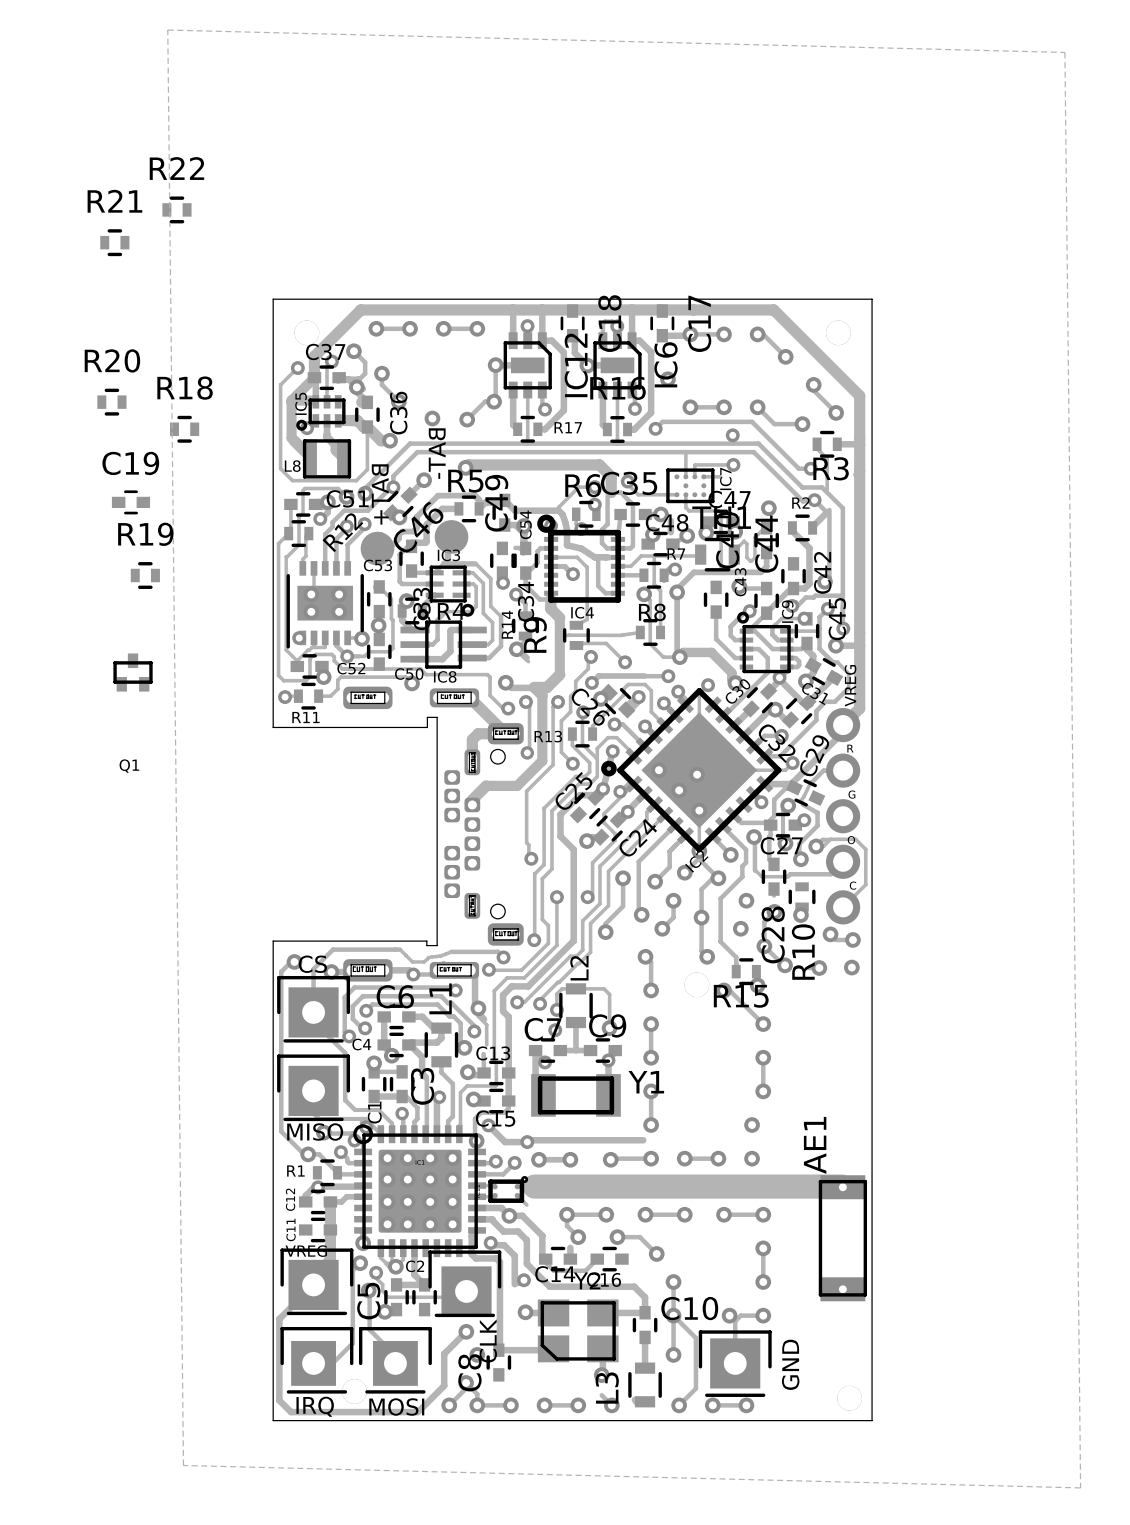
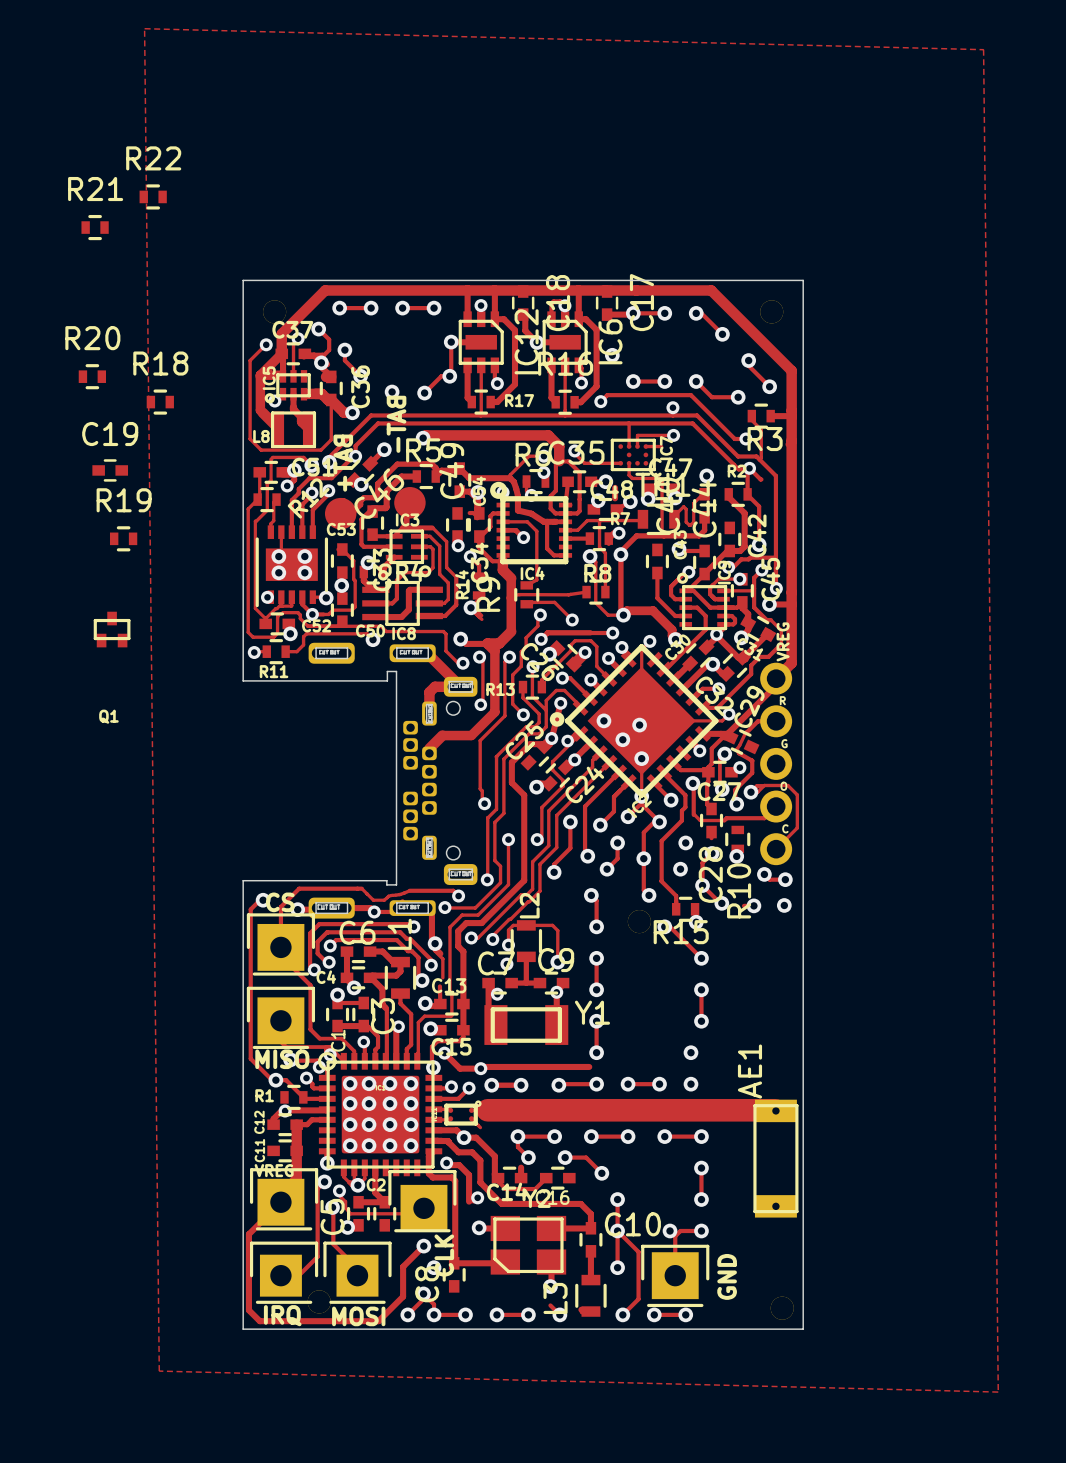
track: (812, 526) (829, 510) (829, 577) (824, 581) -> (748, 469) (747, 494) (759, 506) (759, 544)

